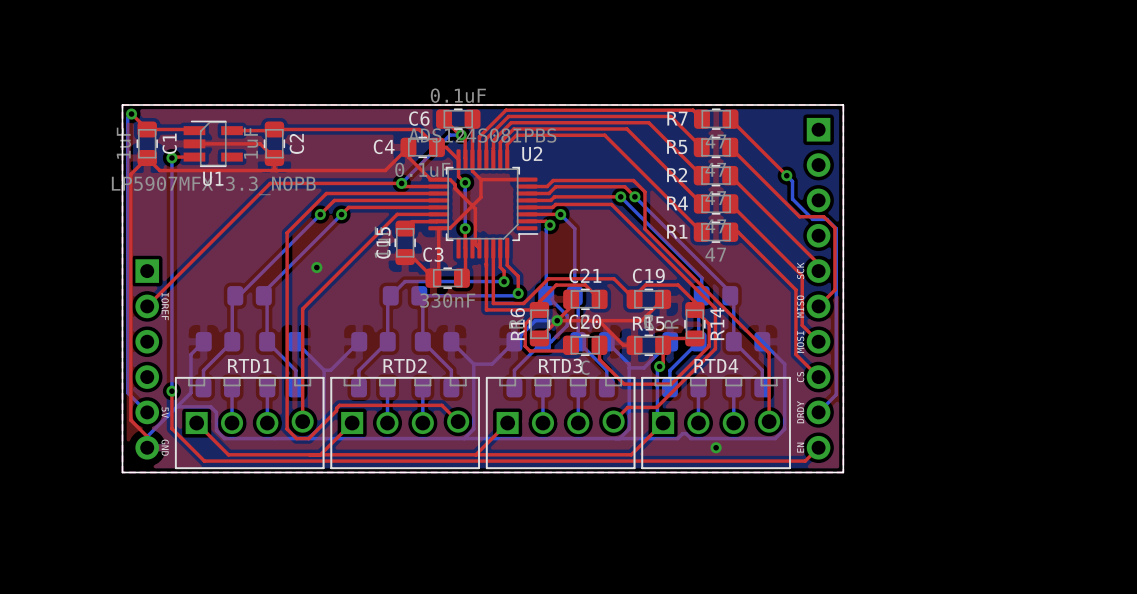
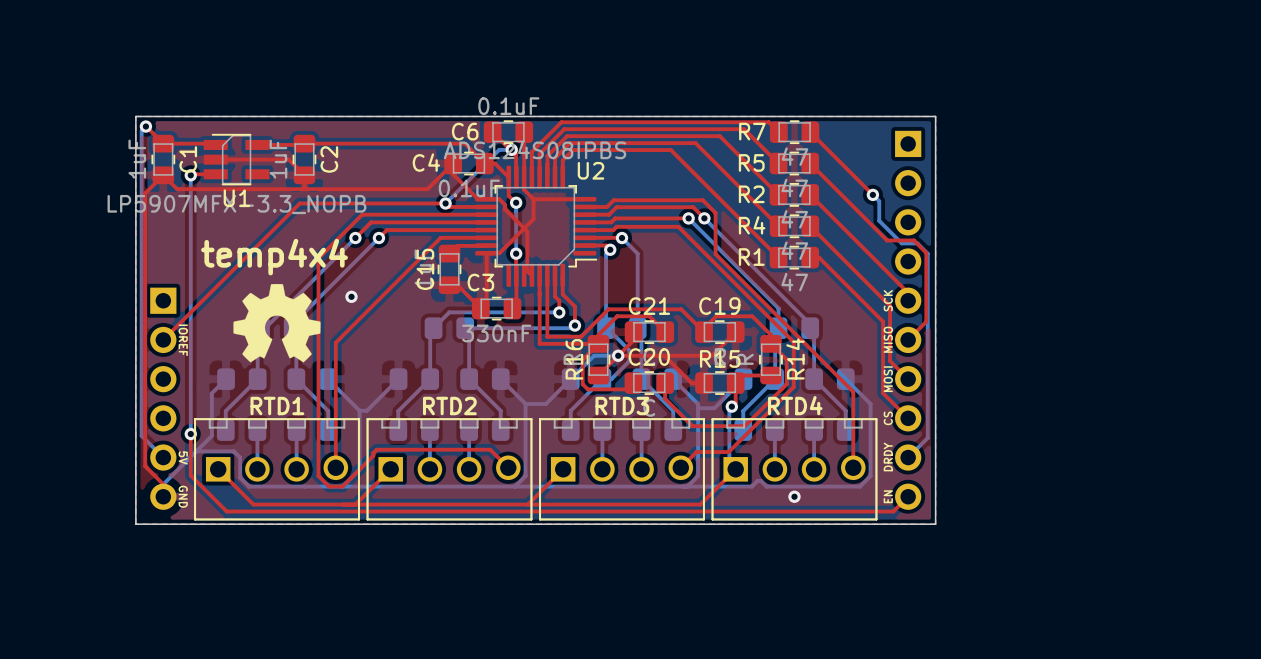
text: none -> temp4x4 (274, 257)
drawing: none -> [233, 283, 321, 363]

